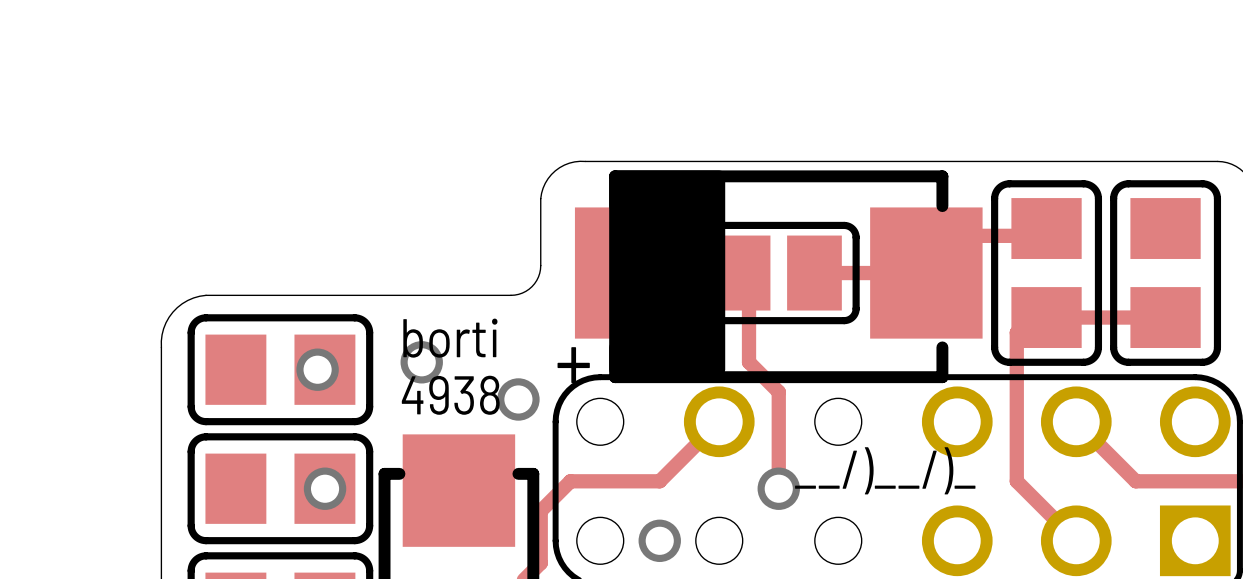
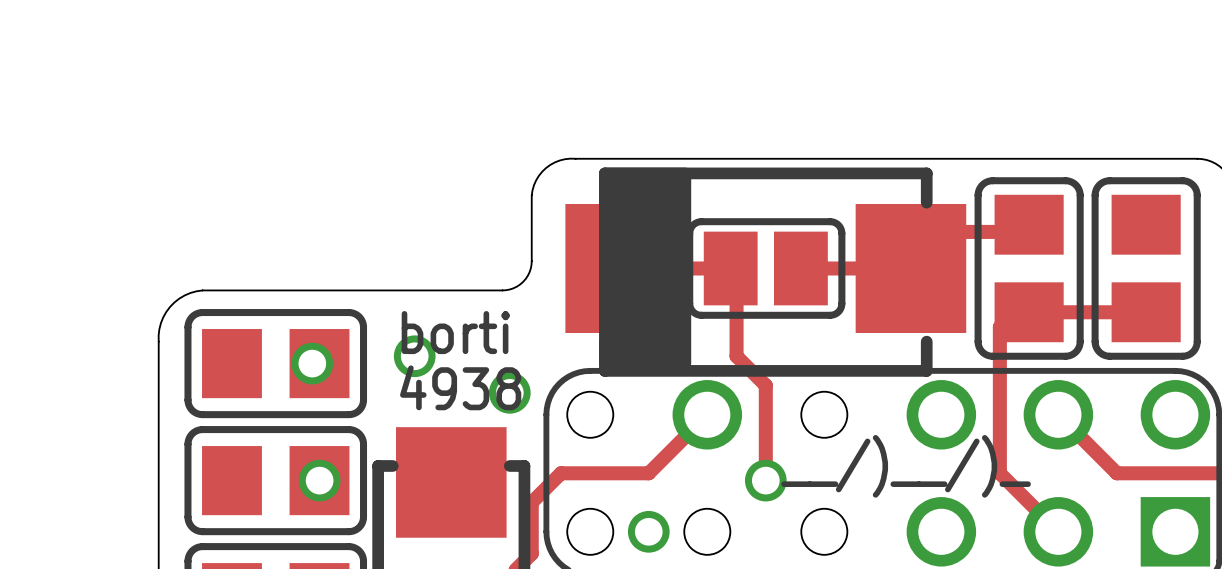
drawing shape: [609, 170, 726, 376] -> [599, 167, 692, 370]
text: + (573, 365) -> none

